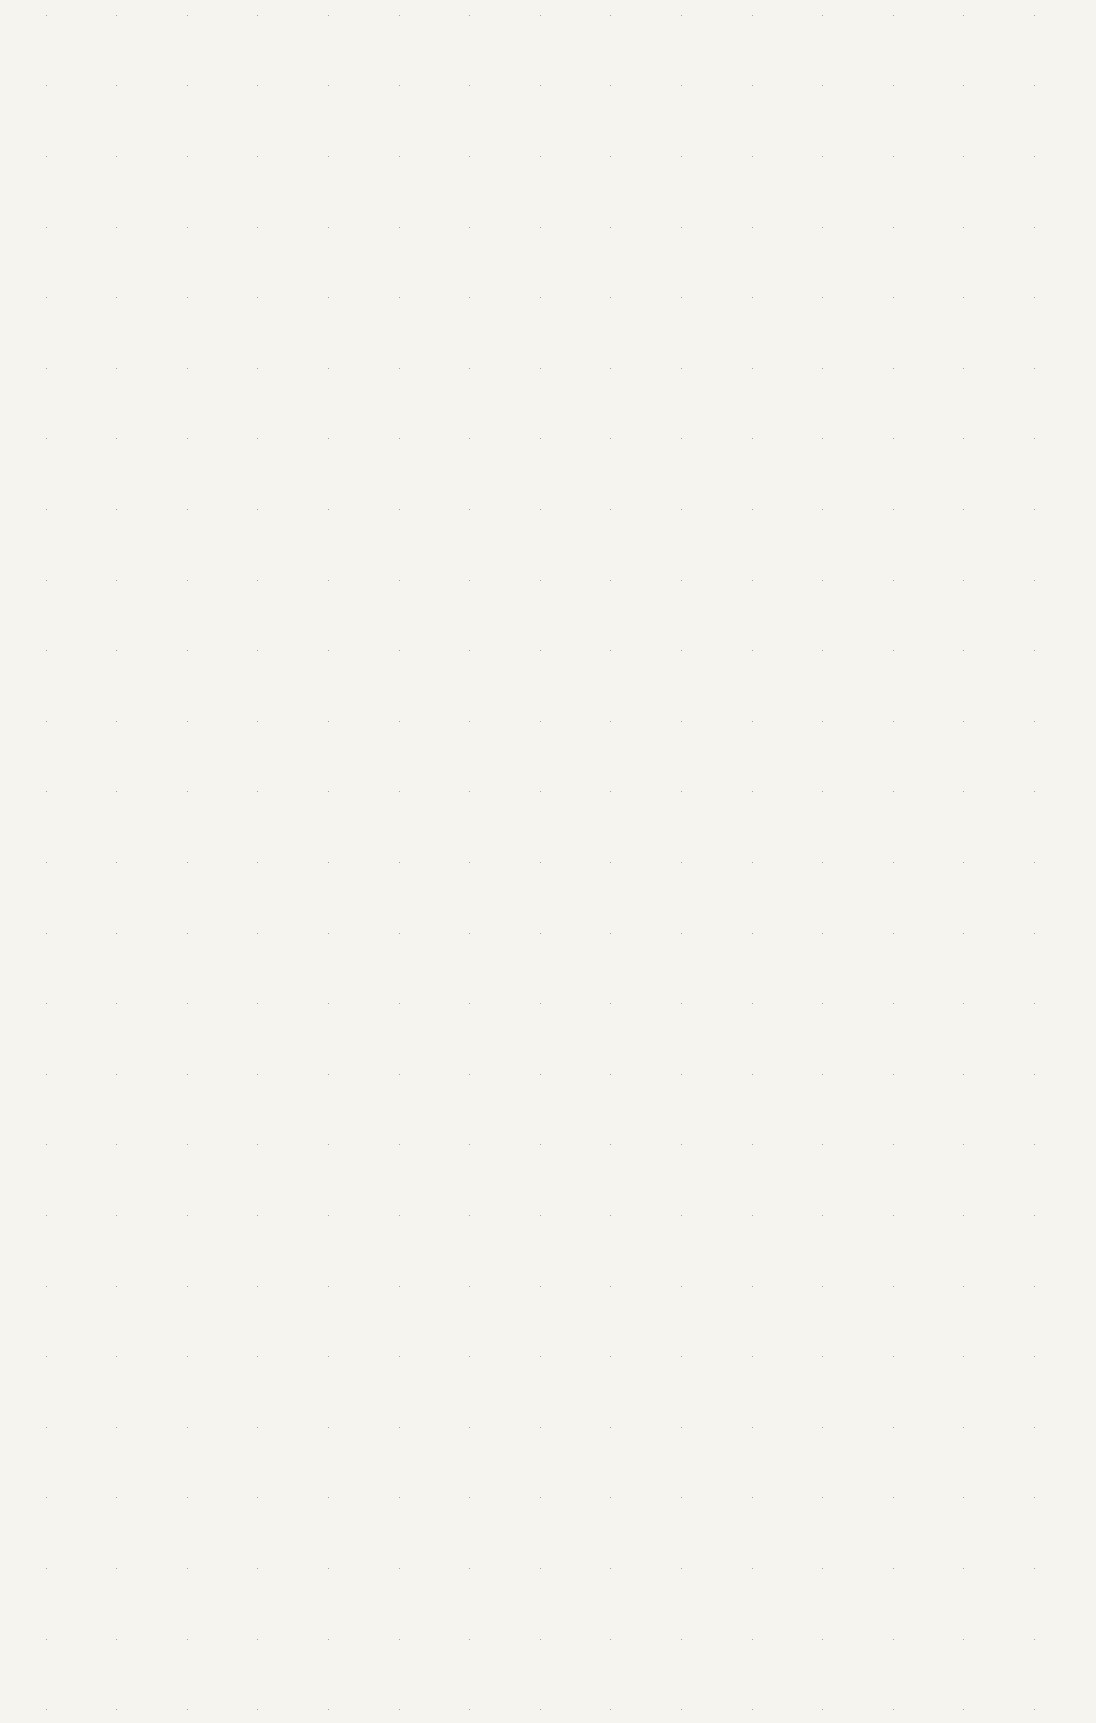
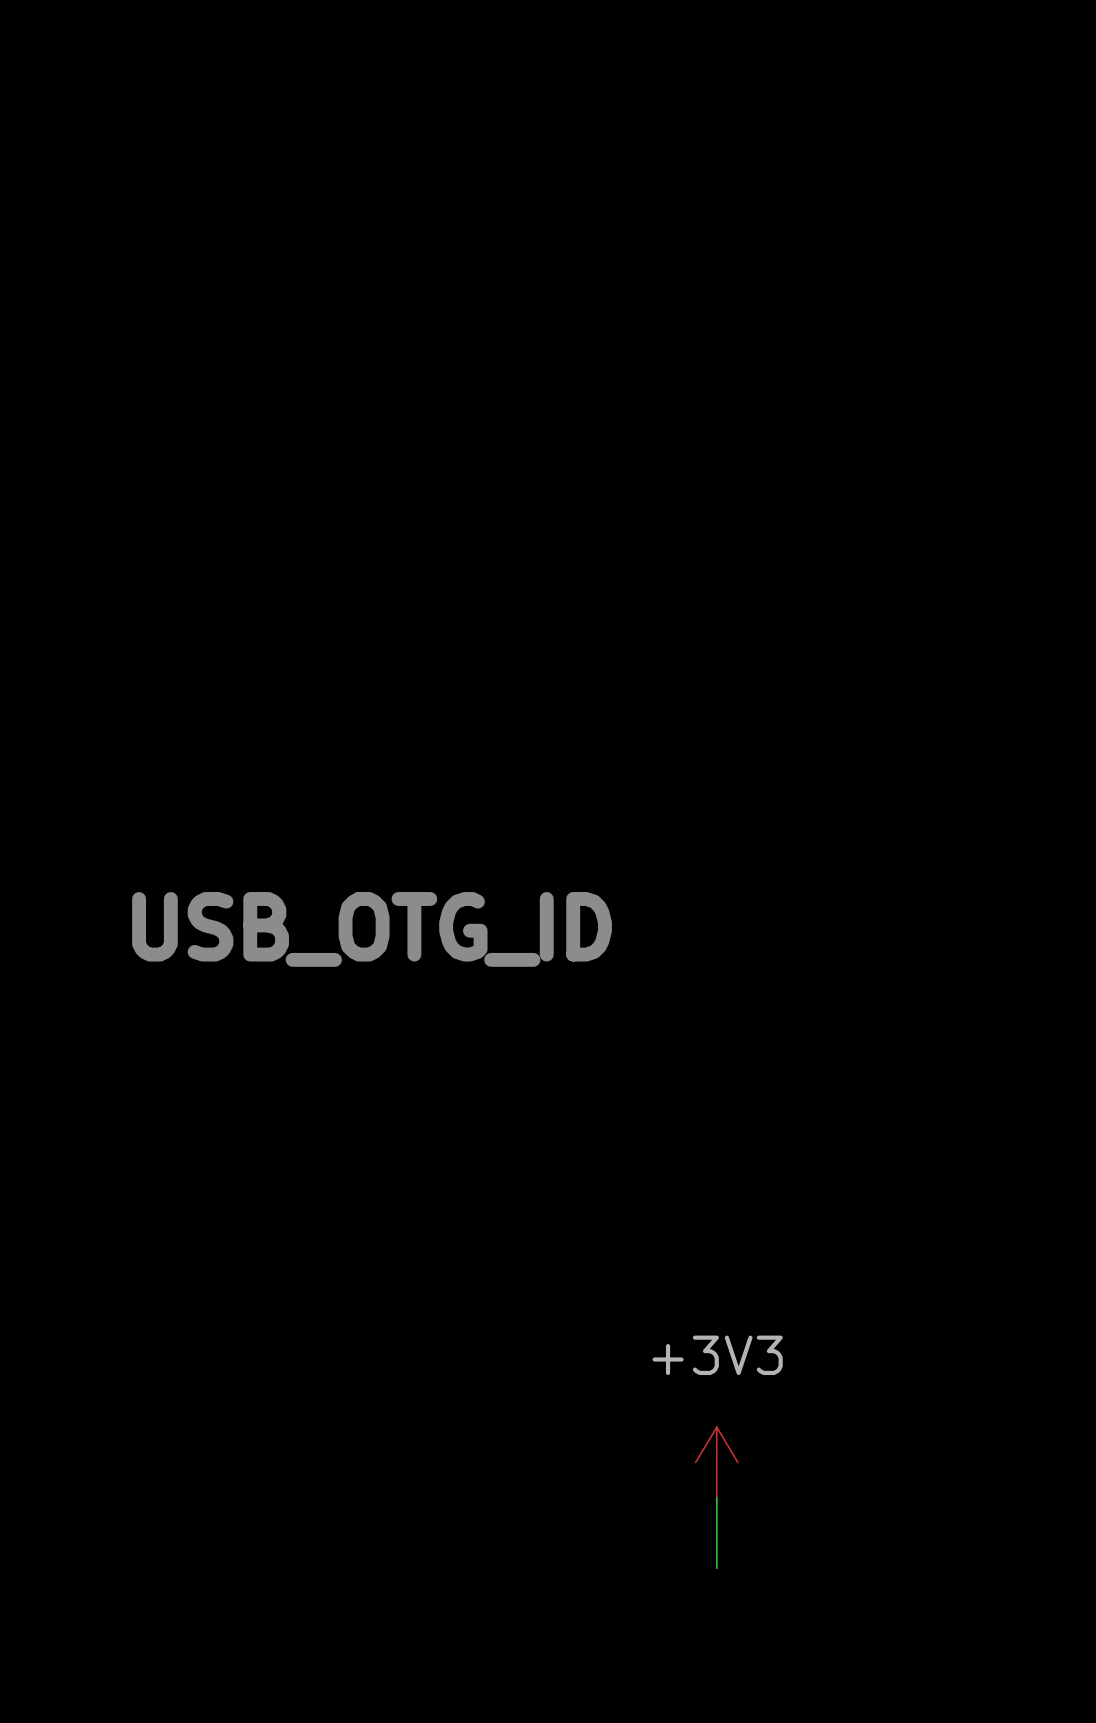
text: none -> USB_OTG_ID (372, 929)
power symbol: none -> +3V3 (716, 1462)
wire: none -> (716, 1497) (716, 1568)

